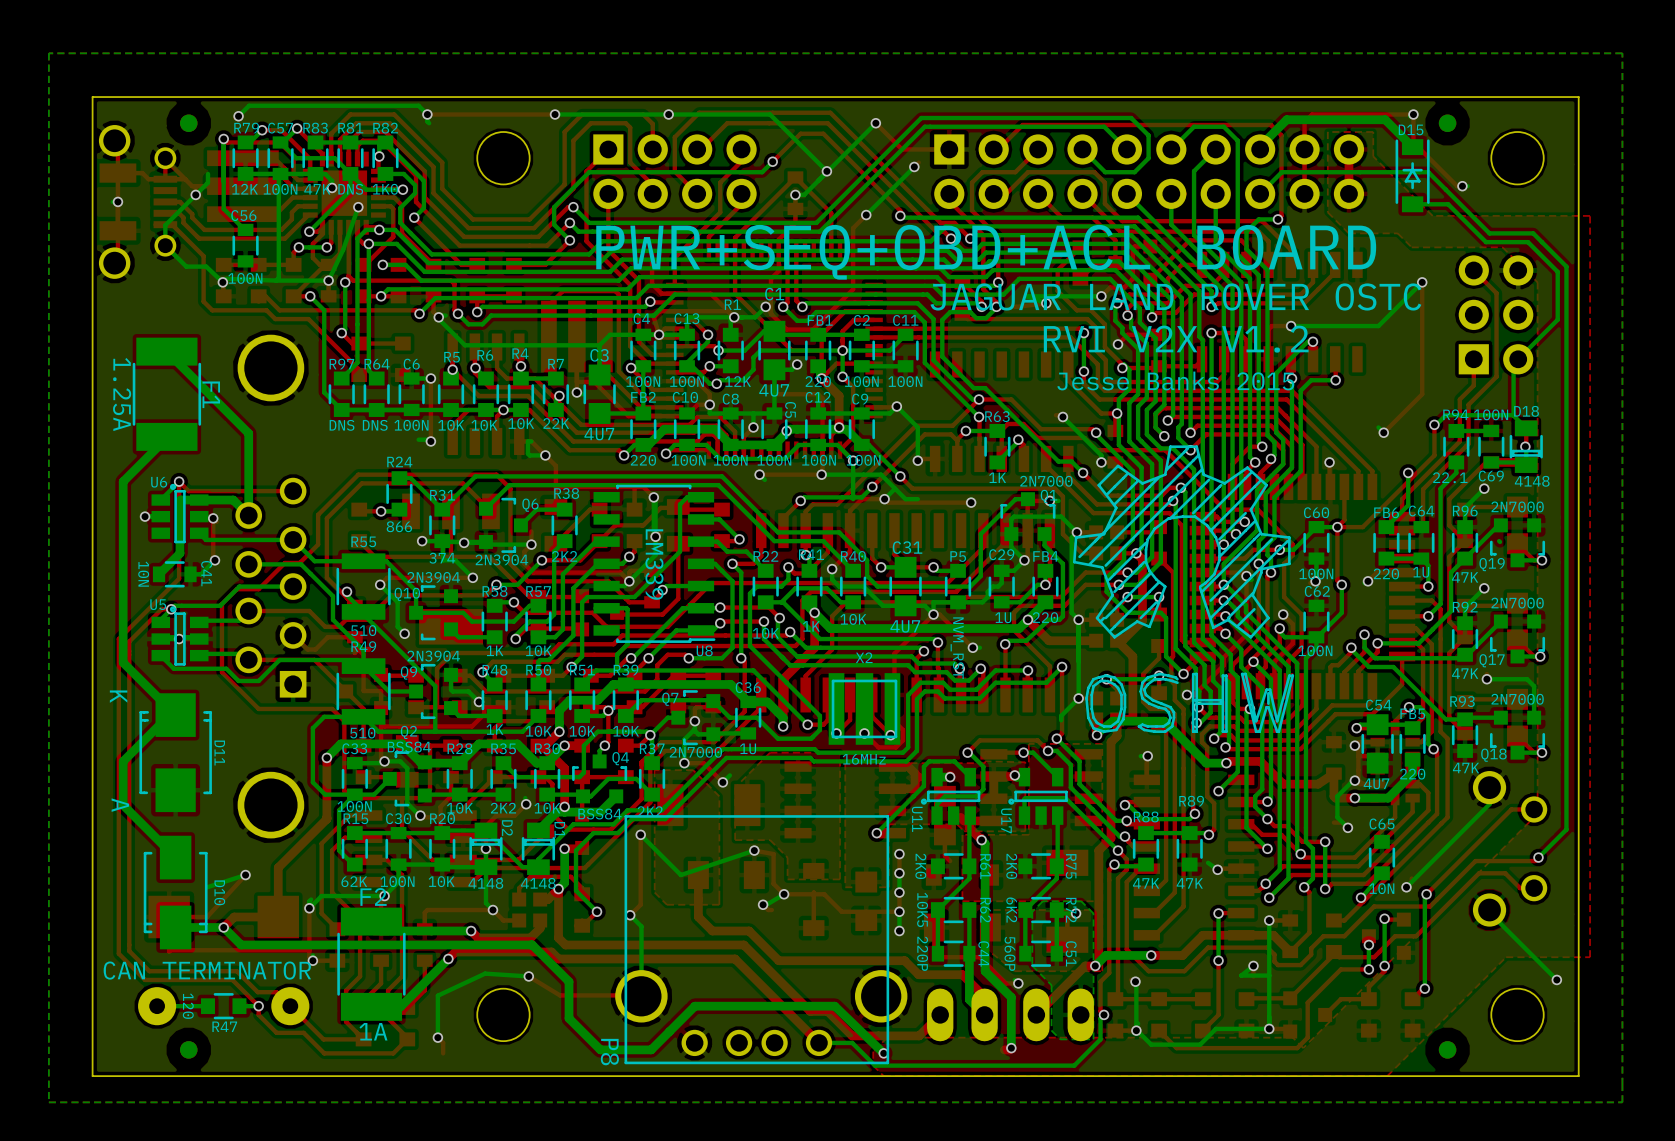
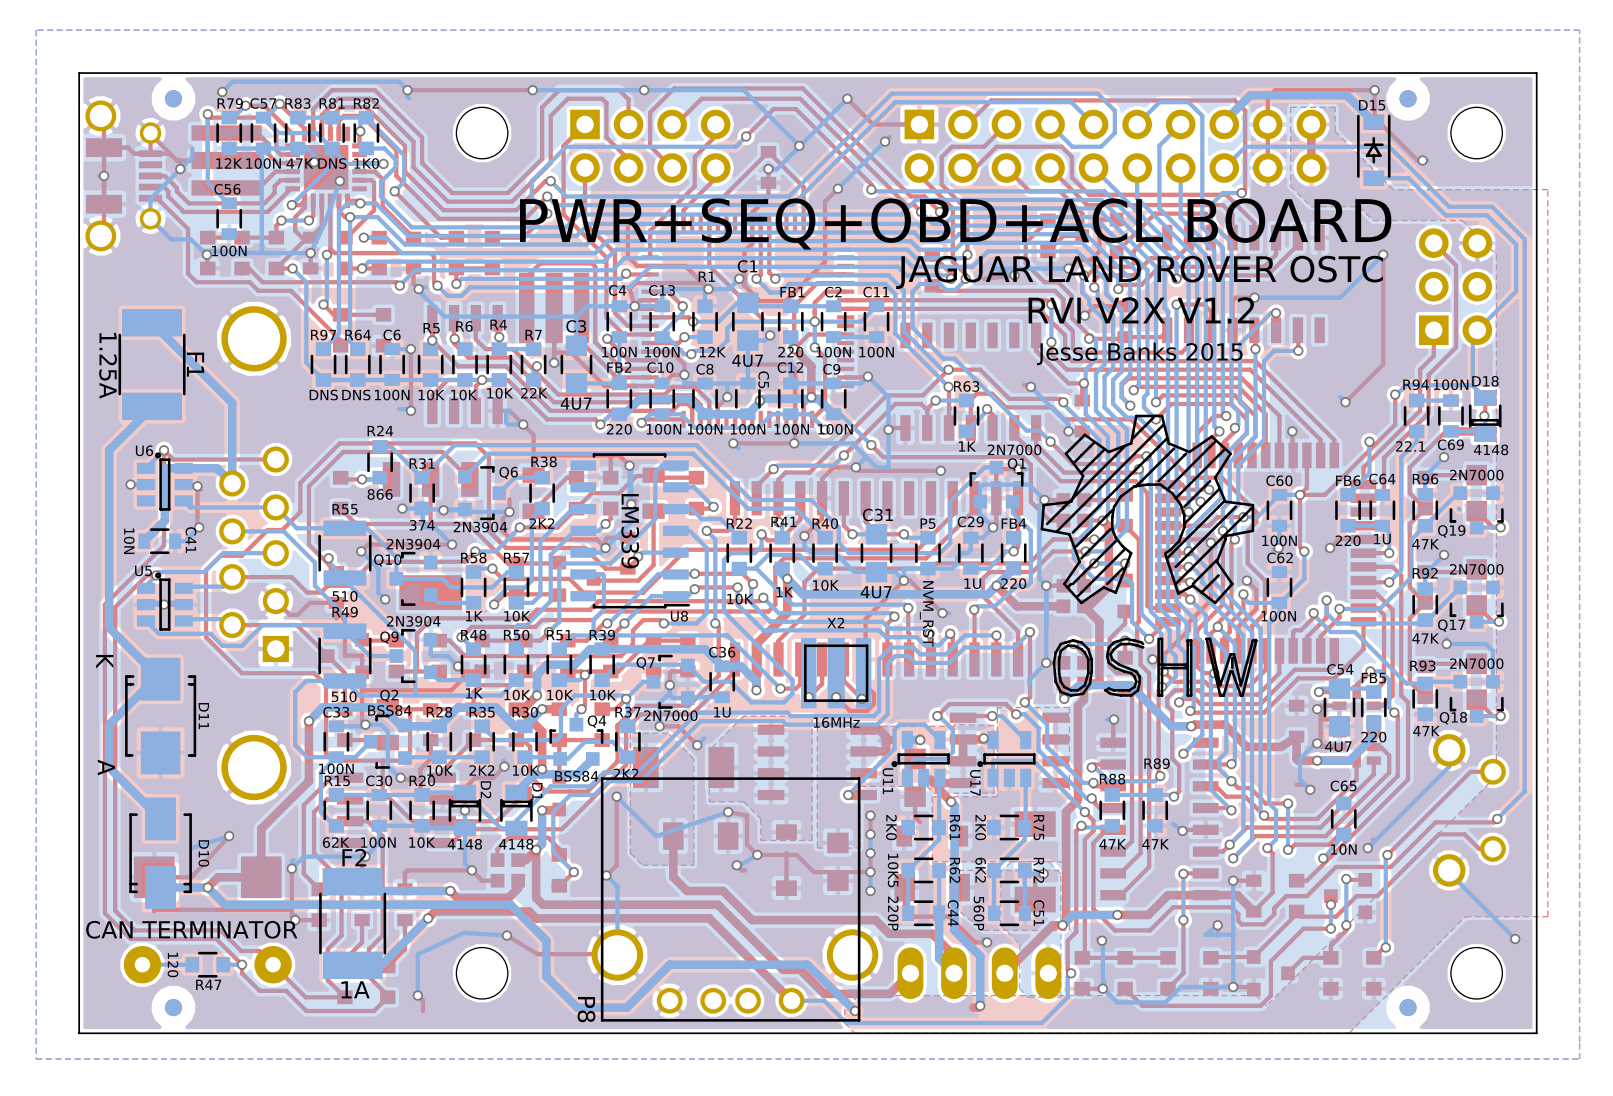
bottom track: (853, 460) (853, 499) -> (888, 429) (888, 467)

